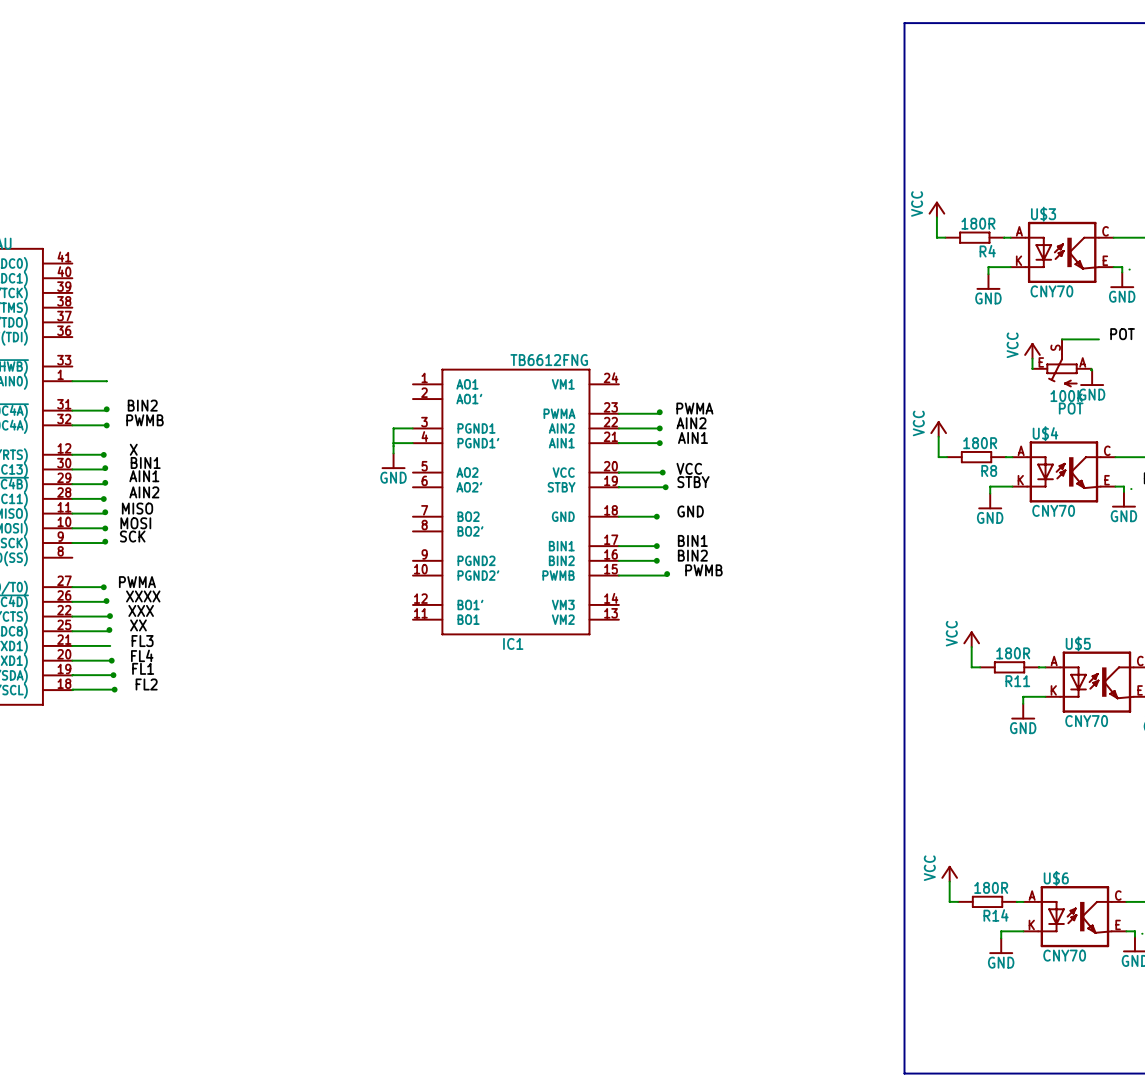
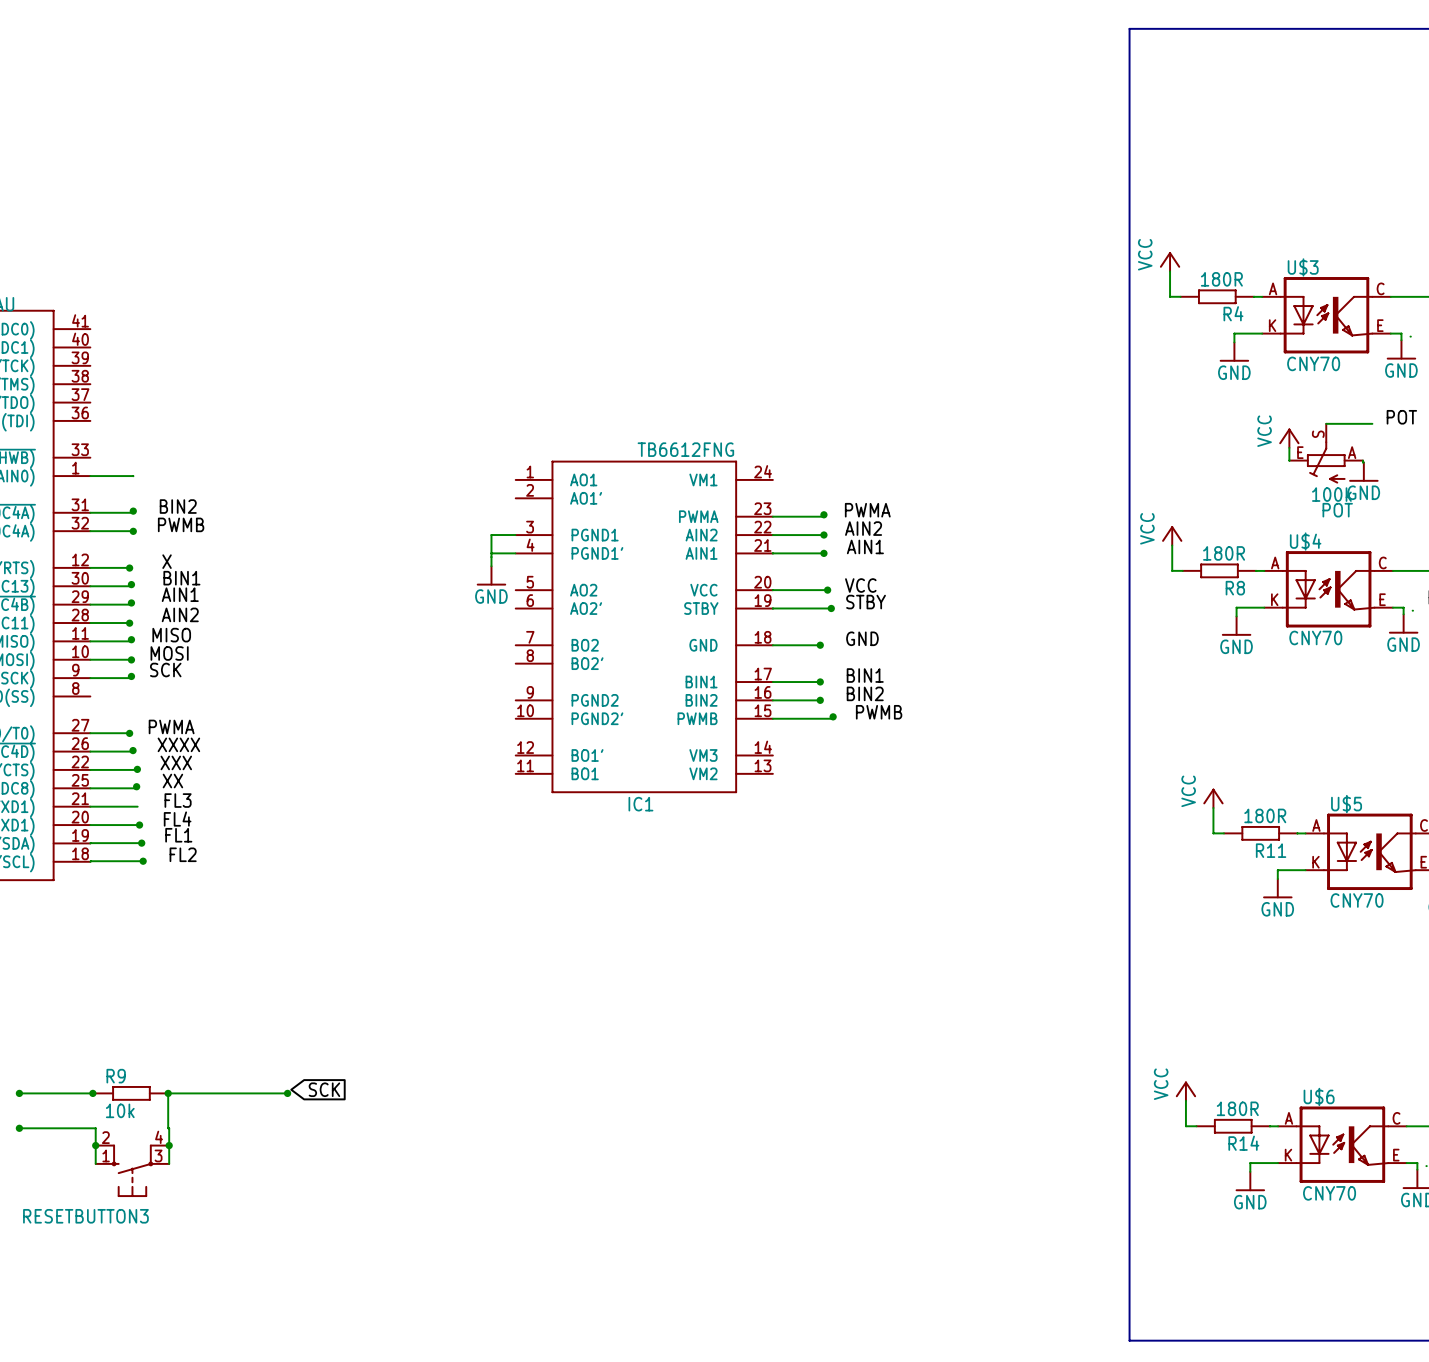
global label: none -> SCK (324, 1089)
wire: none -> (19, 1093) (94, 1093)
junction: none -> (19, 1093)
junction: none -> (92, 1093)
R9: none -> 10k (131, 1093)
junction: none -> (168, 1093)
wire: none -> (287, 1093) (168, 1093) (169, 1163)
junction: none -> (287, 1093)
wire: none -> (19, 1128) (95, 1128) (95, 1163)
junction: none -> (19, 1128)
junction: none -> (95, 1145)
junction: none -> (169, 1145)
RESETBUTTON3: none -> (132, 1171)

